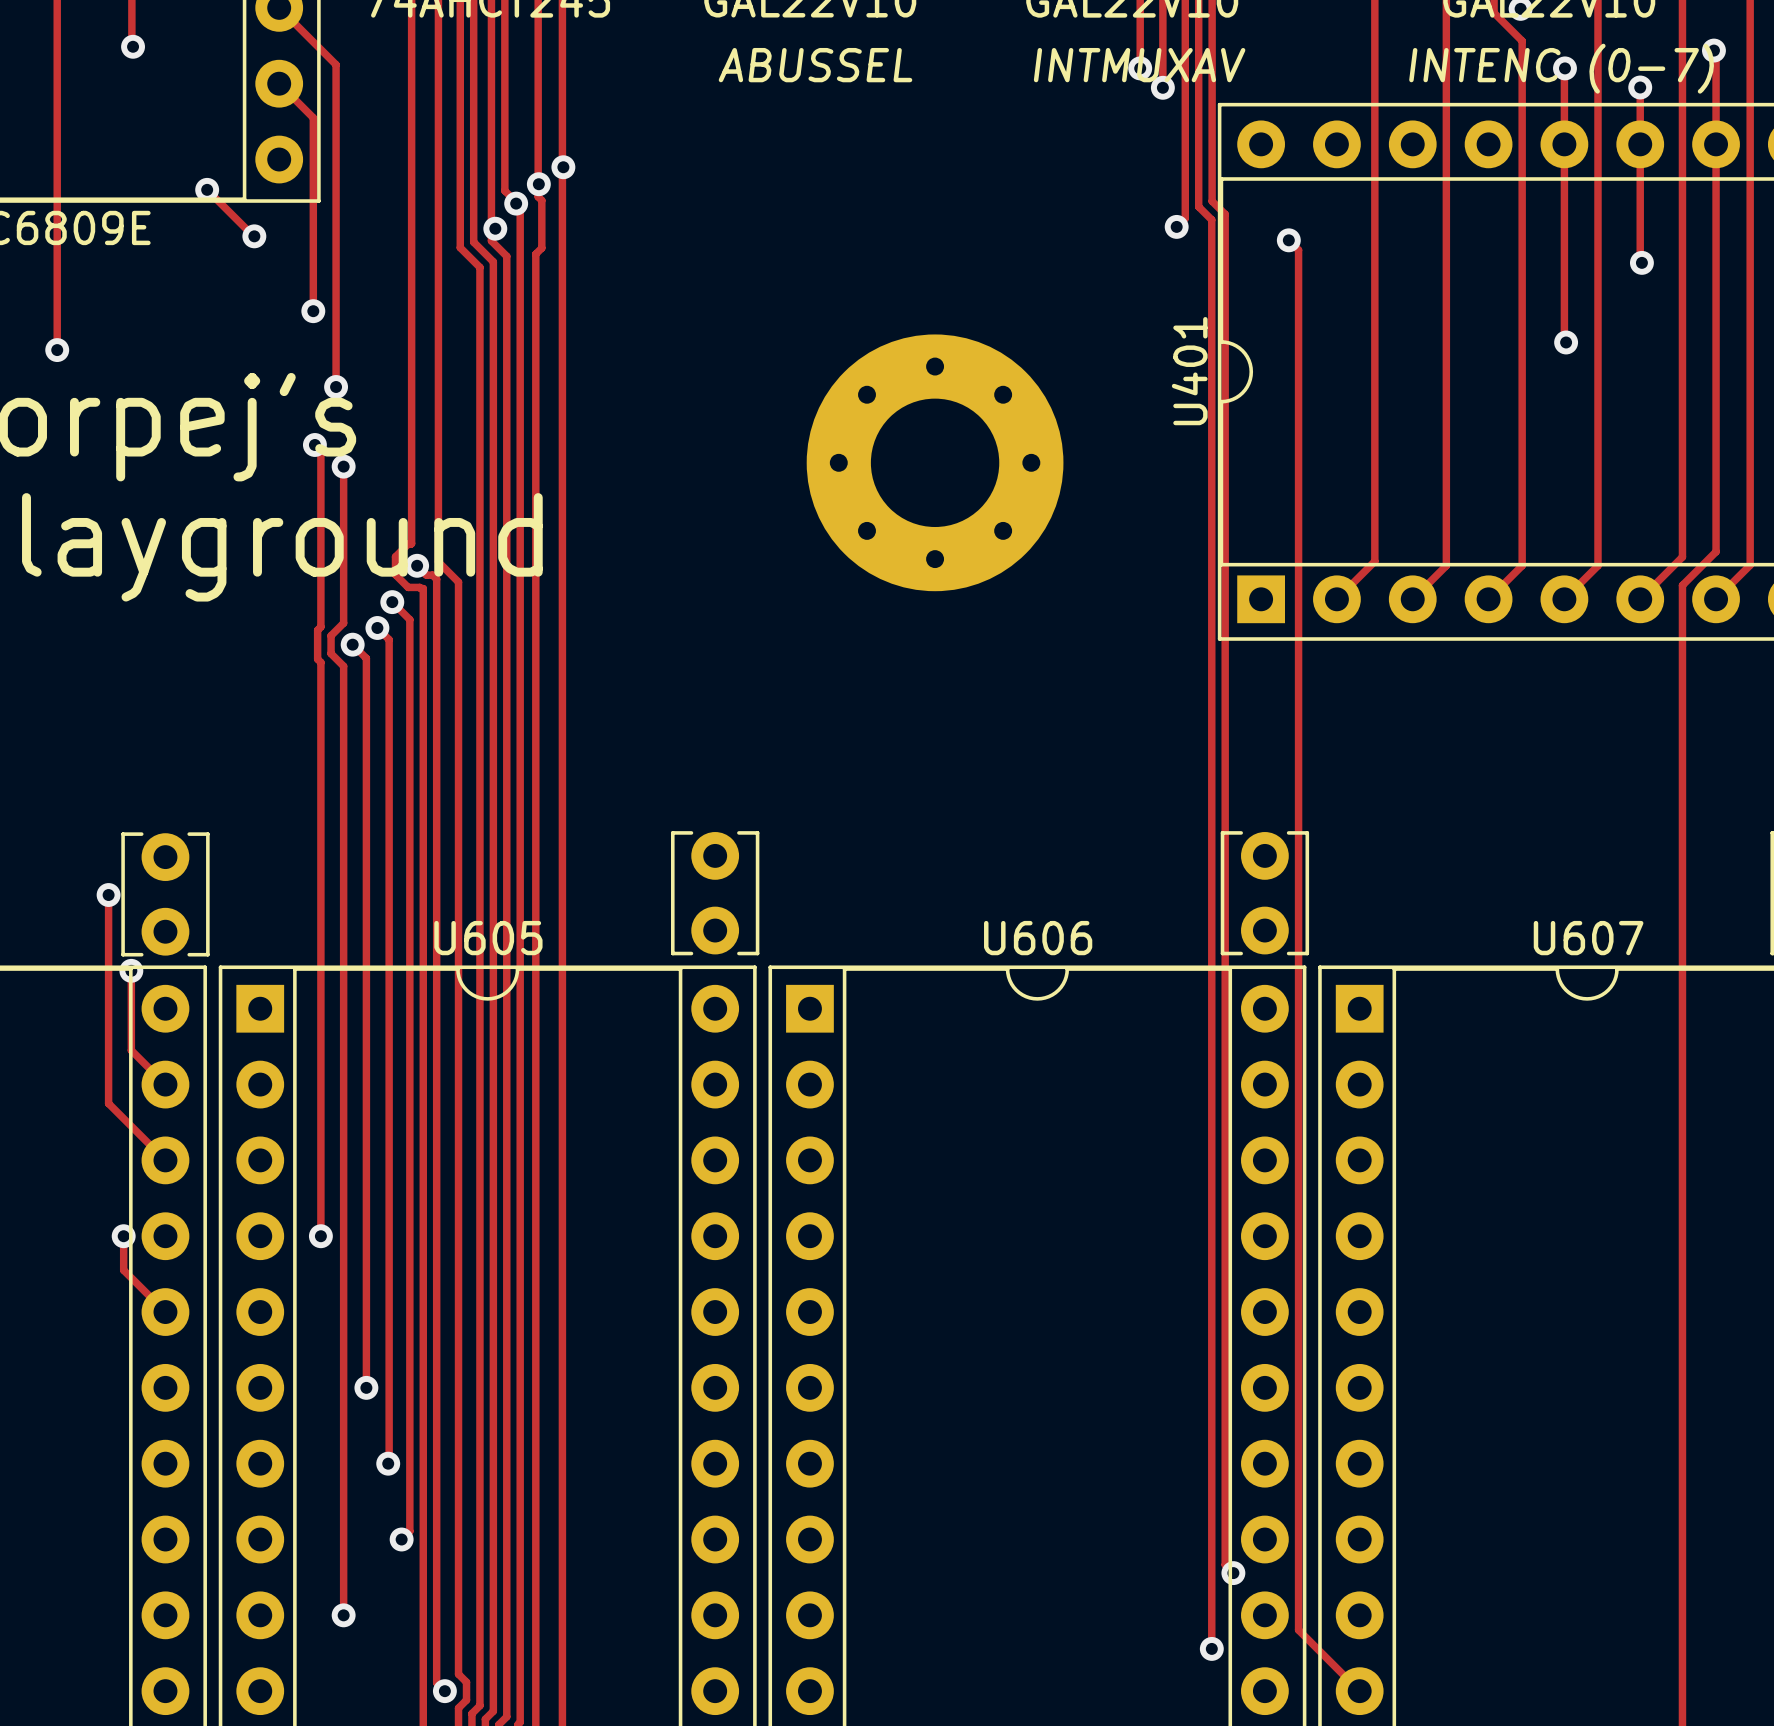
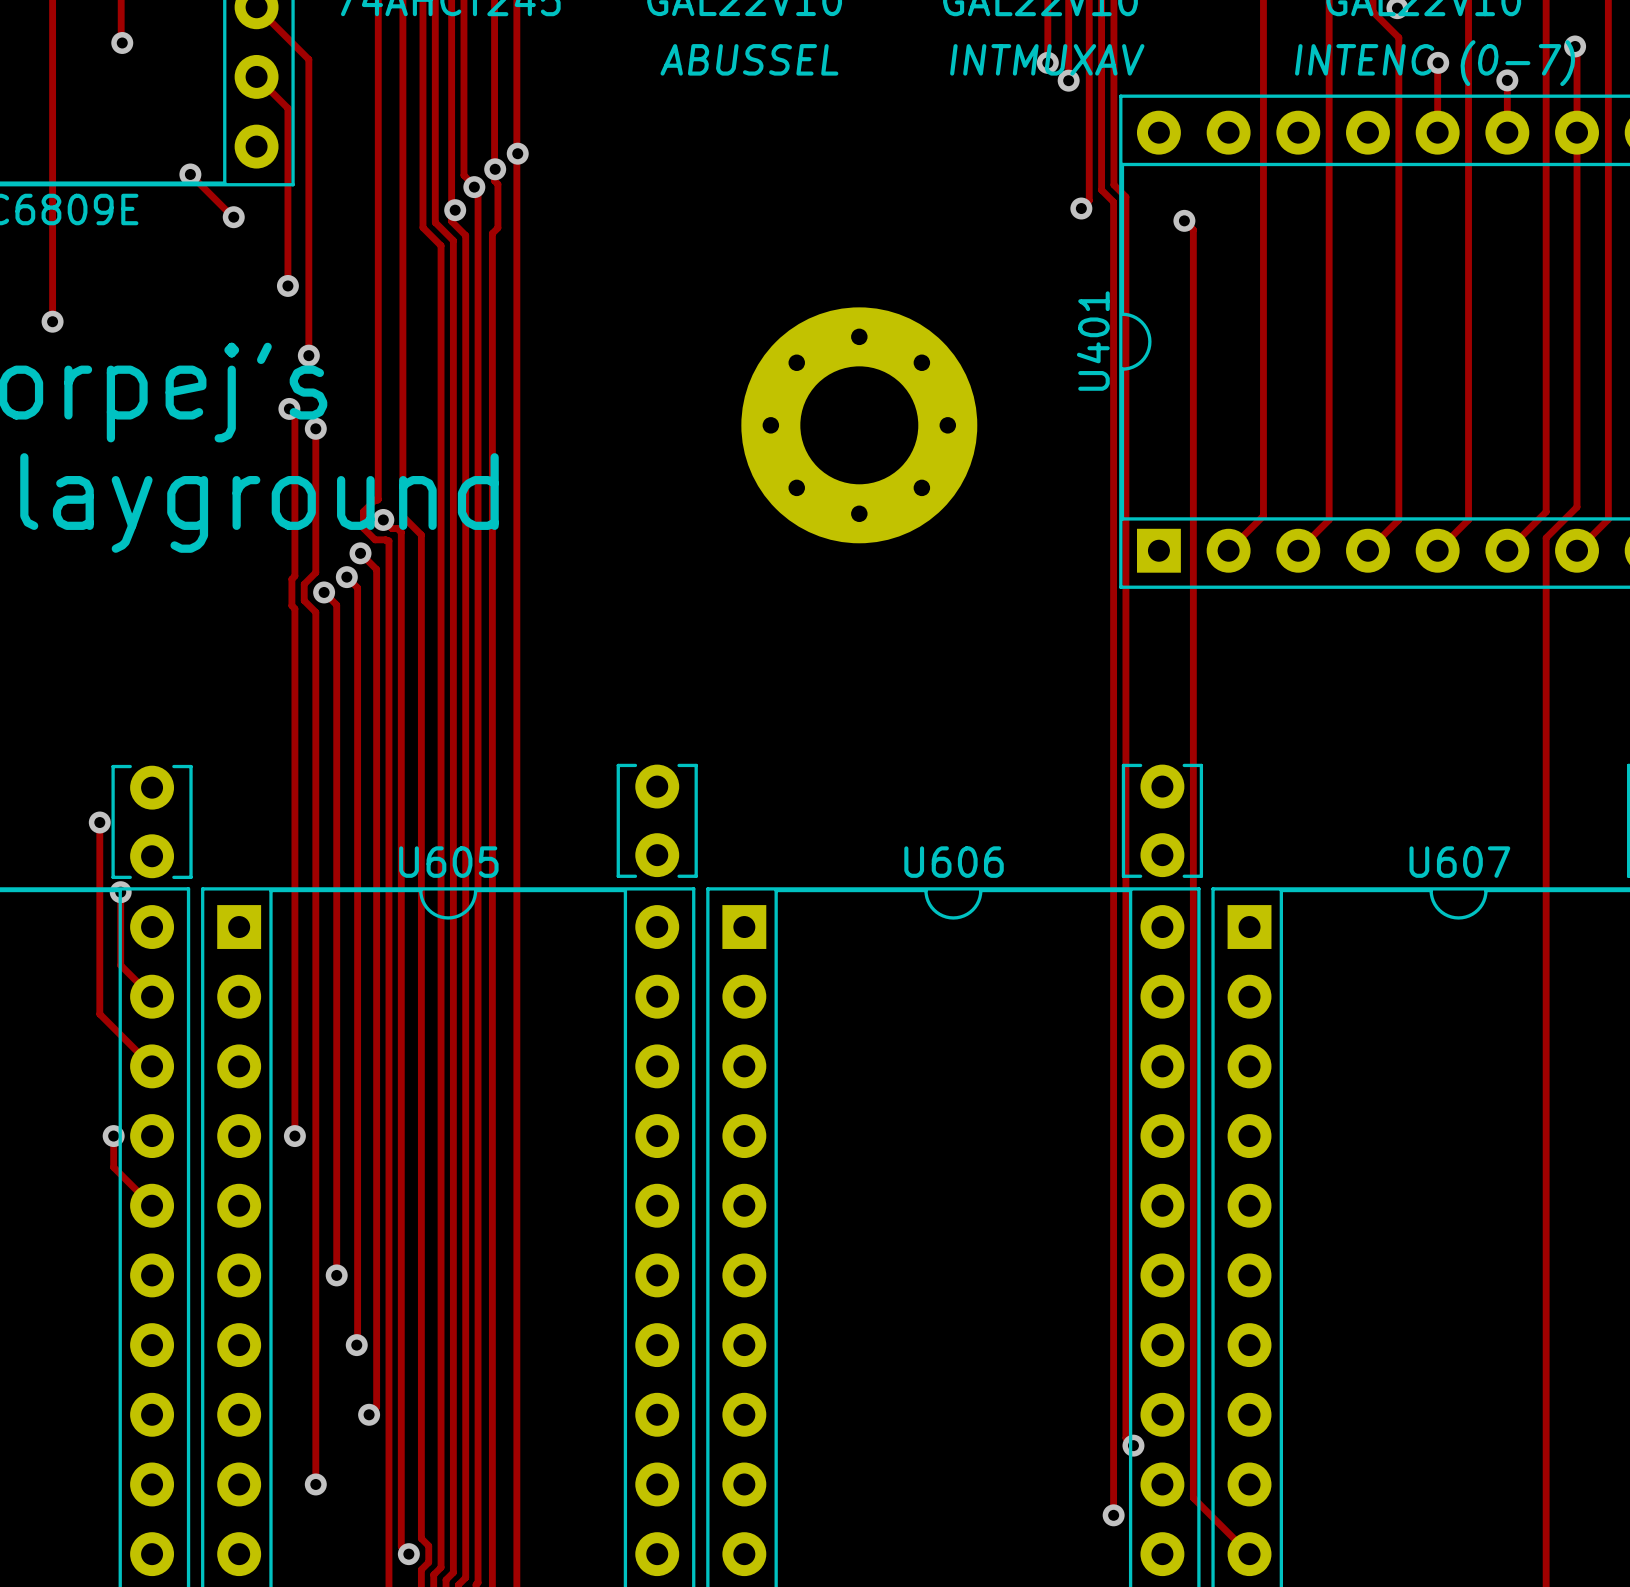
track: (1564, 144) (1564, 340) (1566, 342) -> none
track: (1640, 144) (1640, 261) (1641, 262) -> none
via: (1641, 262) -> none
via: (1566, 342) -> none

